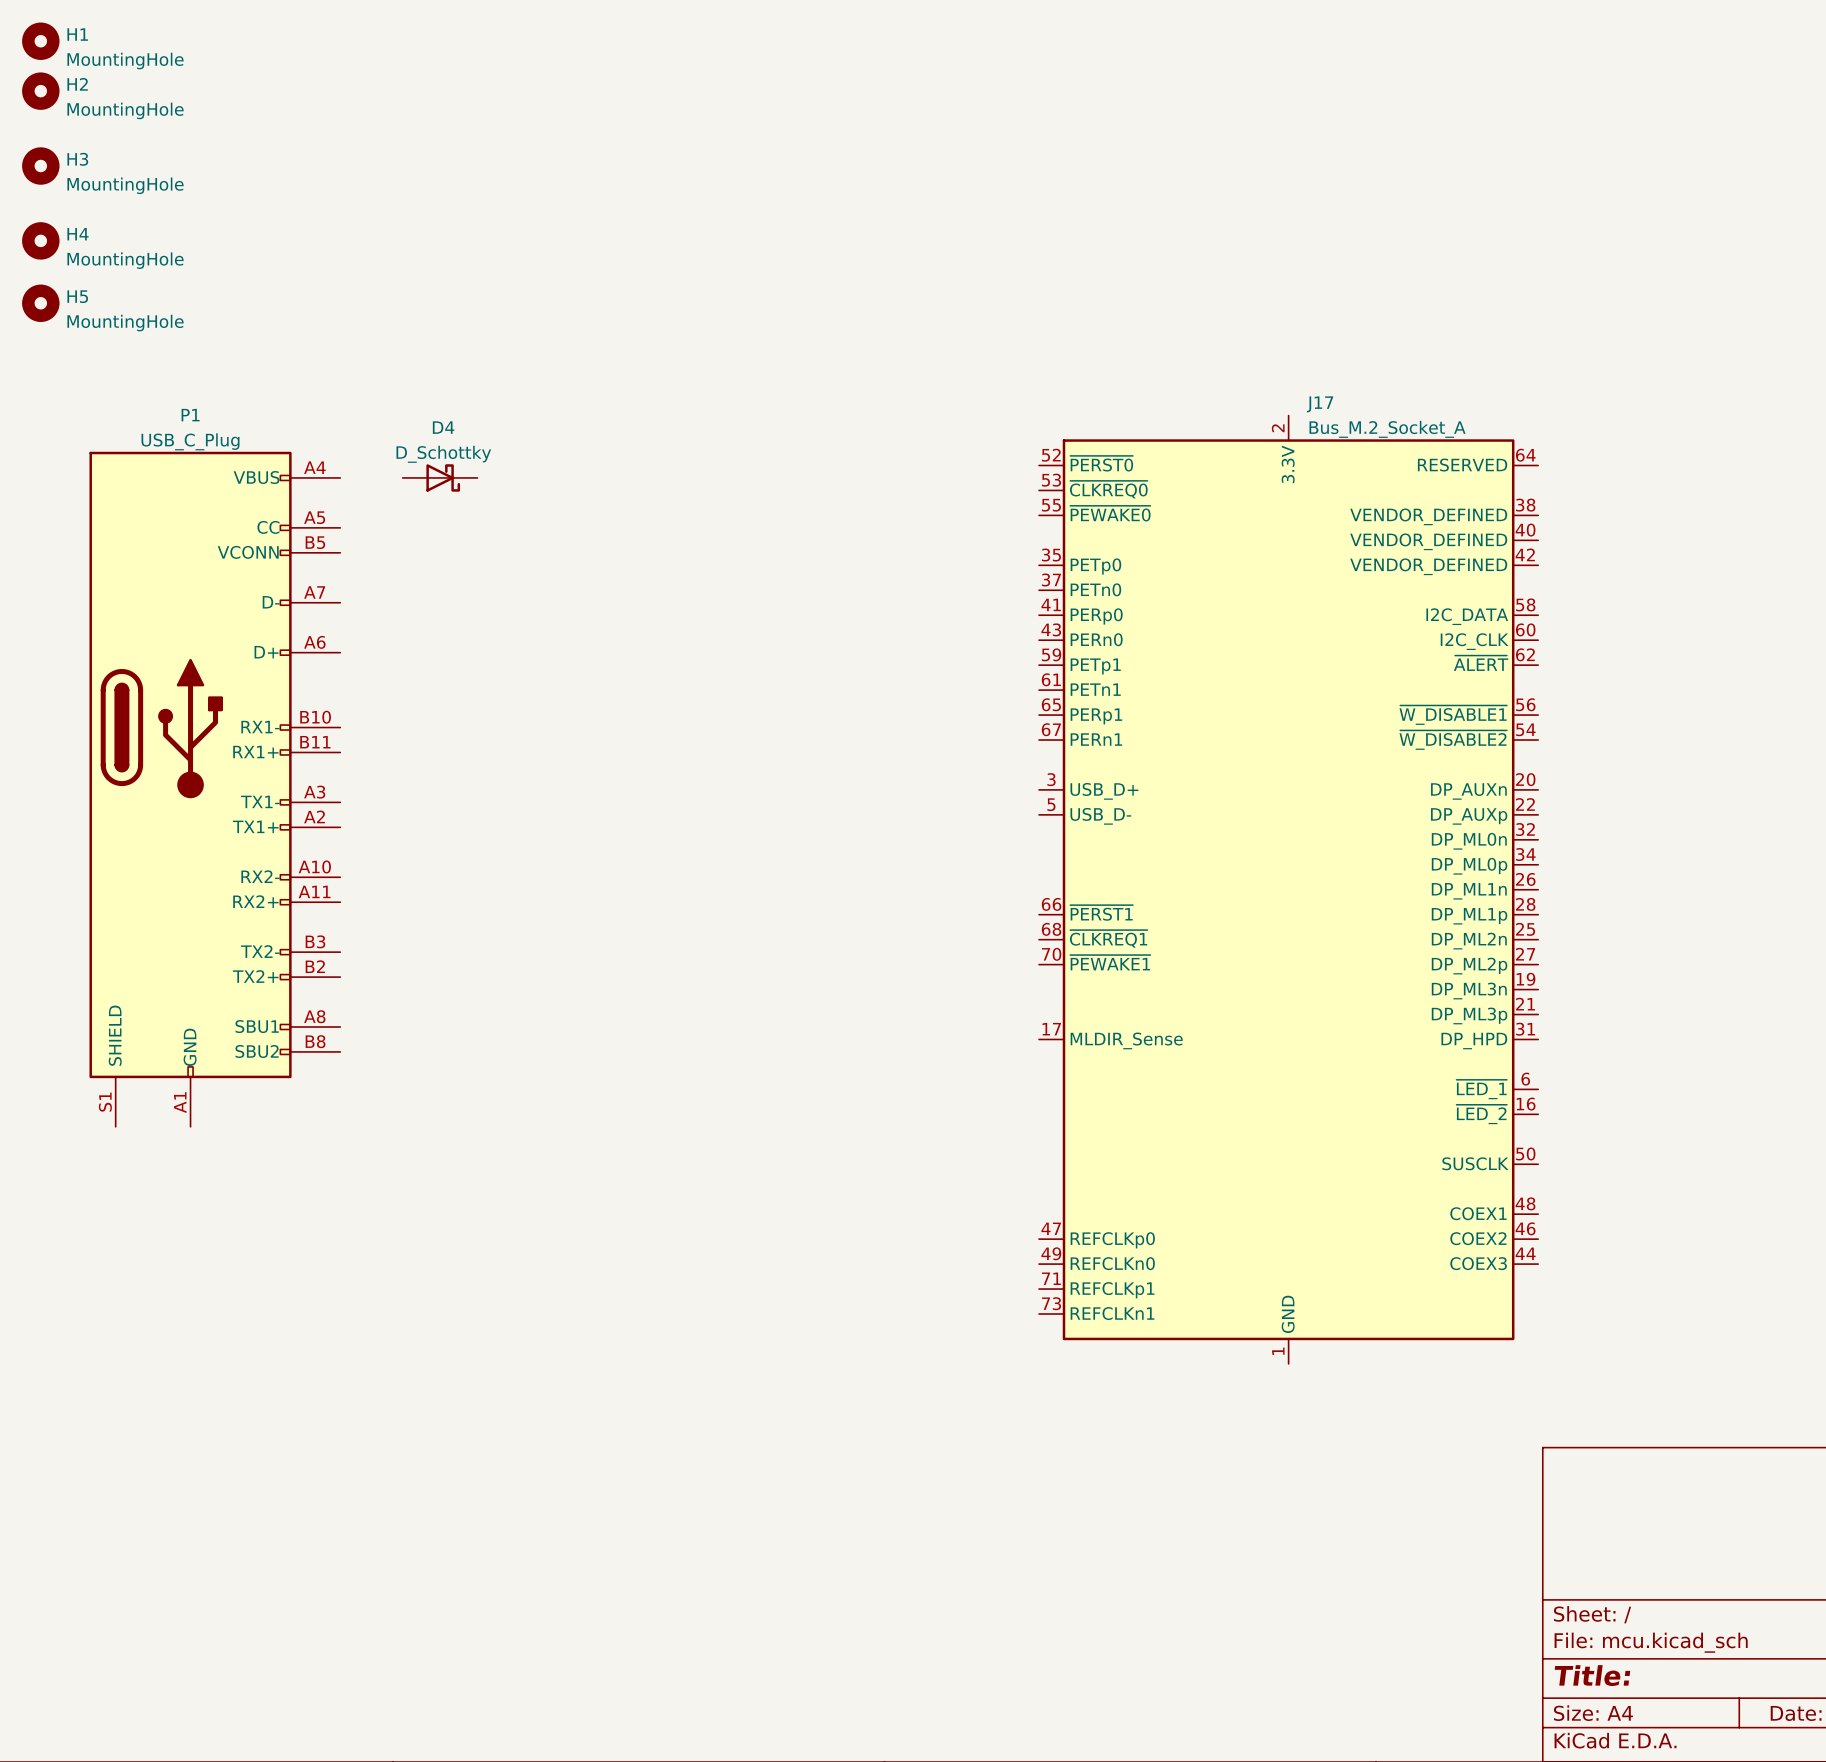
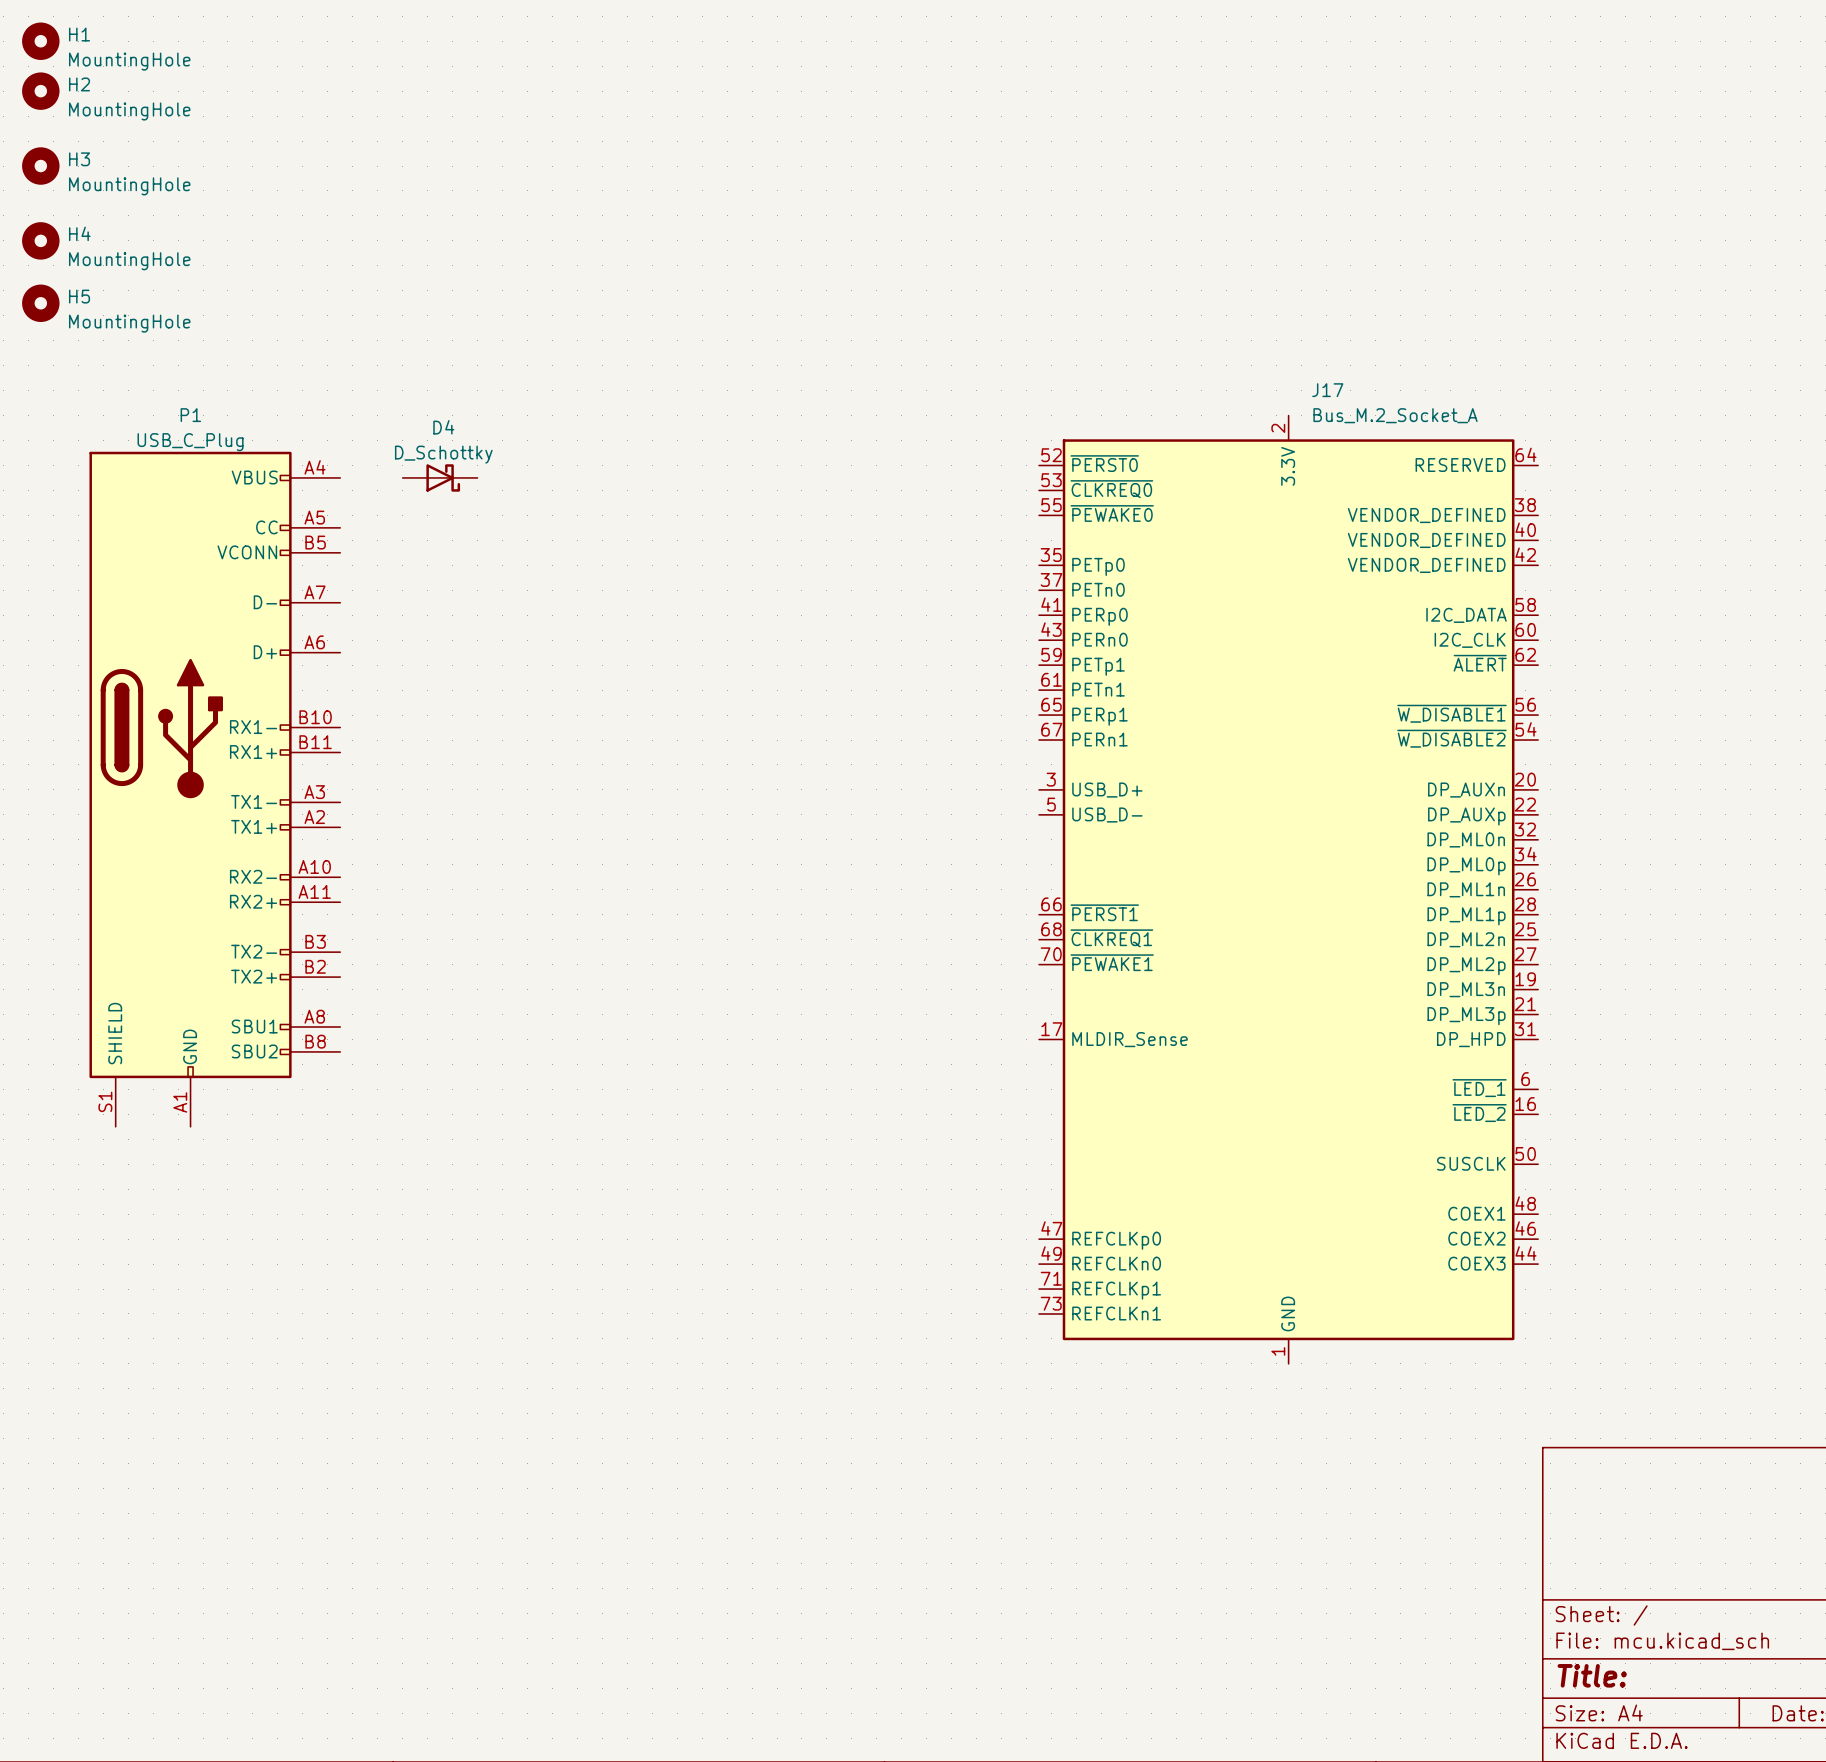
J17 name position: J17 (1320, 404) -> J17 (1327, 390)
J17 value position: Bus_M.2_Socket_A (1387, 429) -> Bus_M.2_Socket_A (1395, 415)

